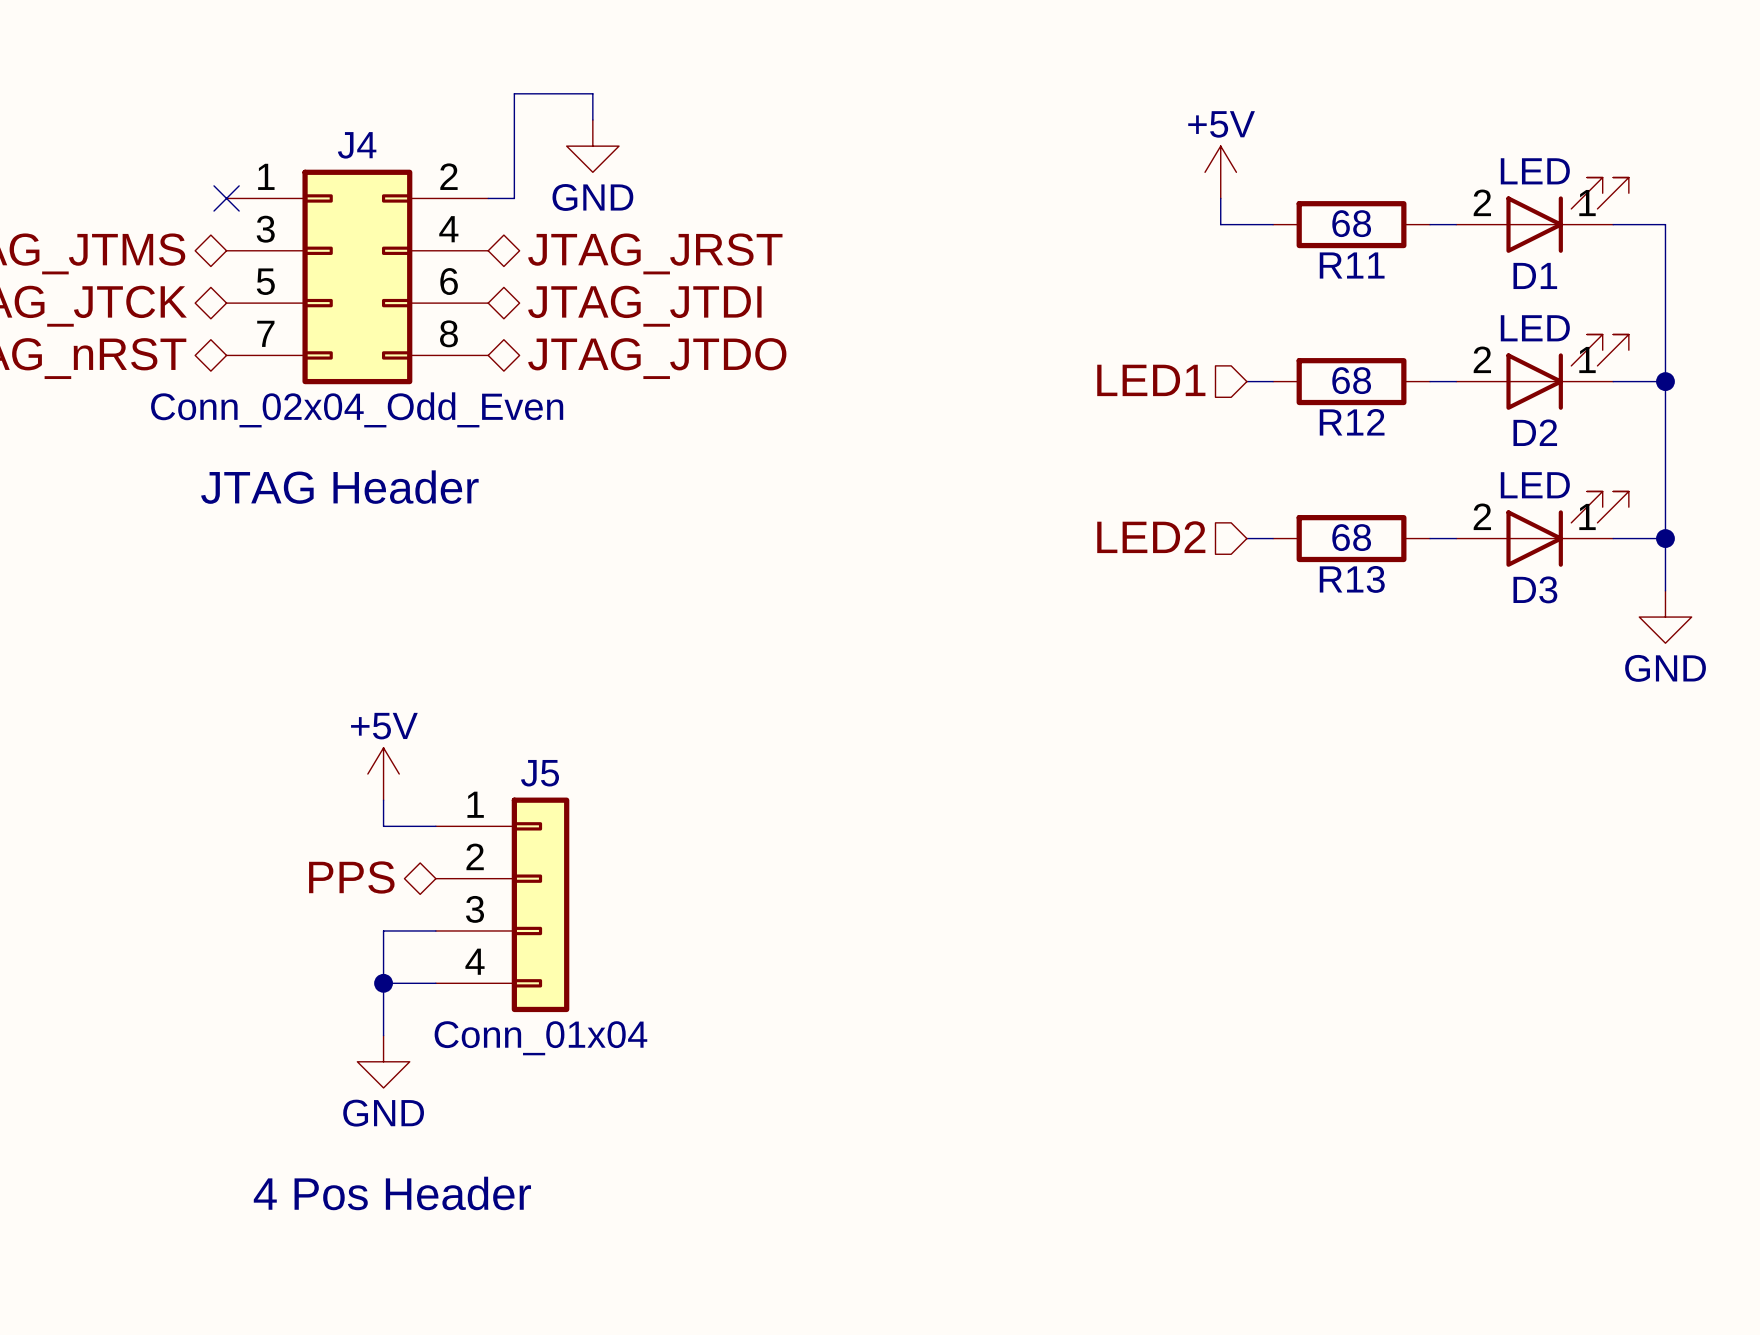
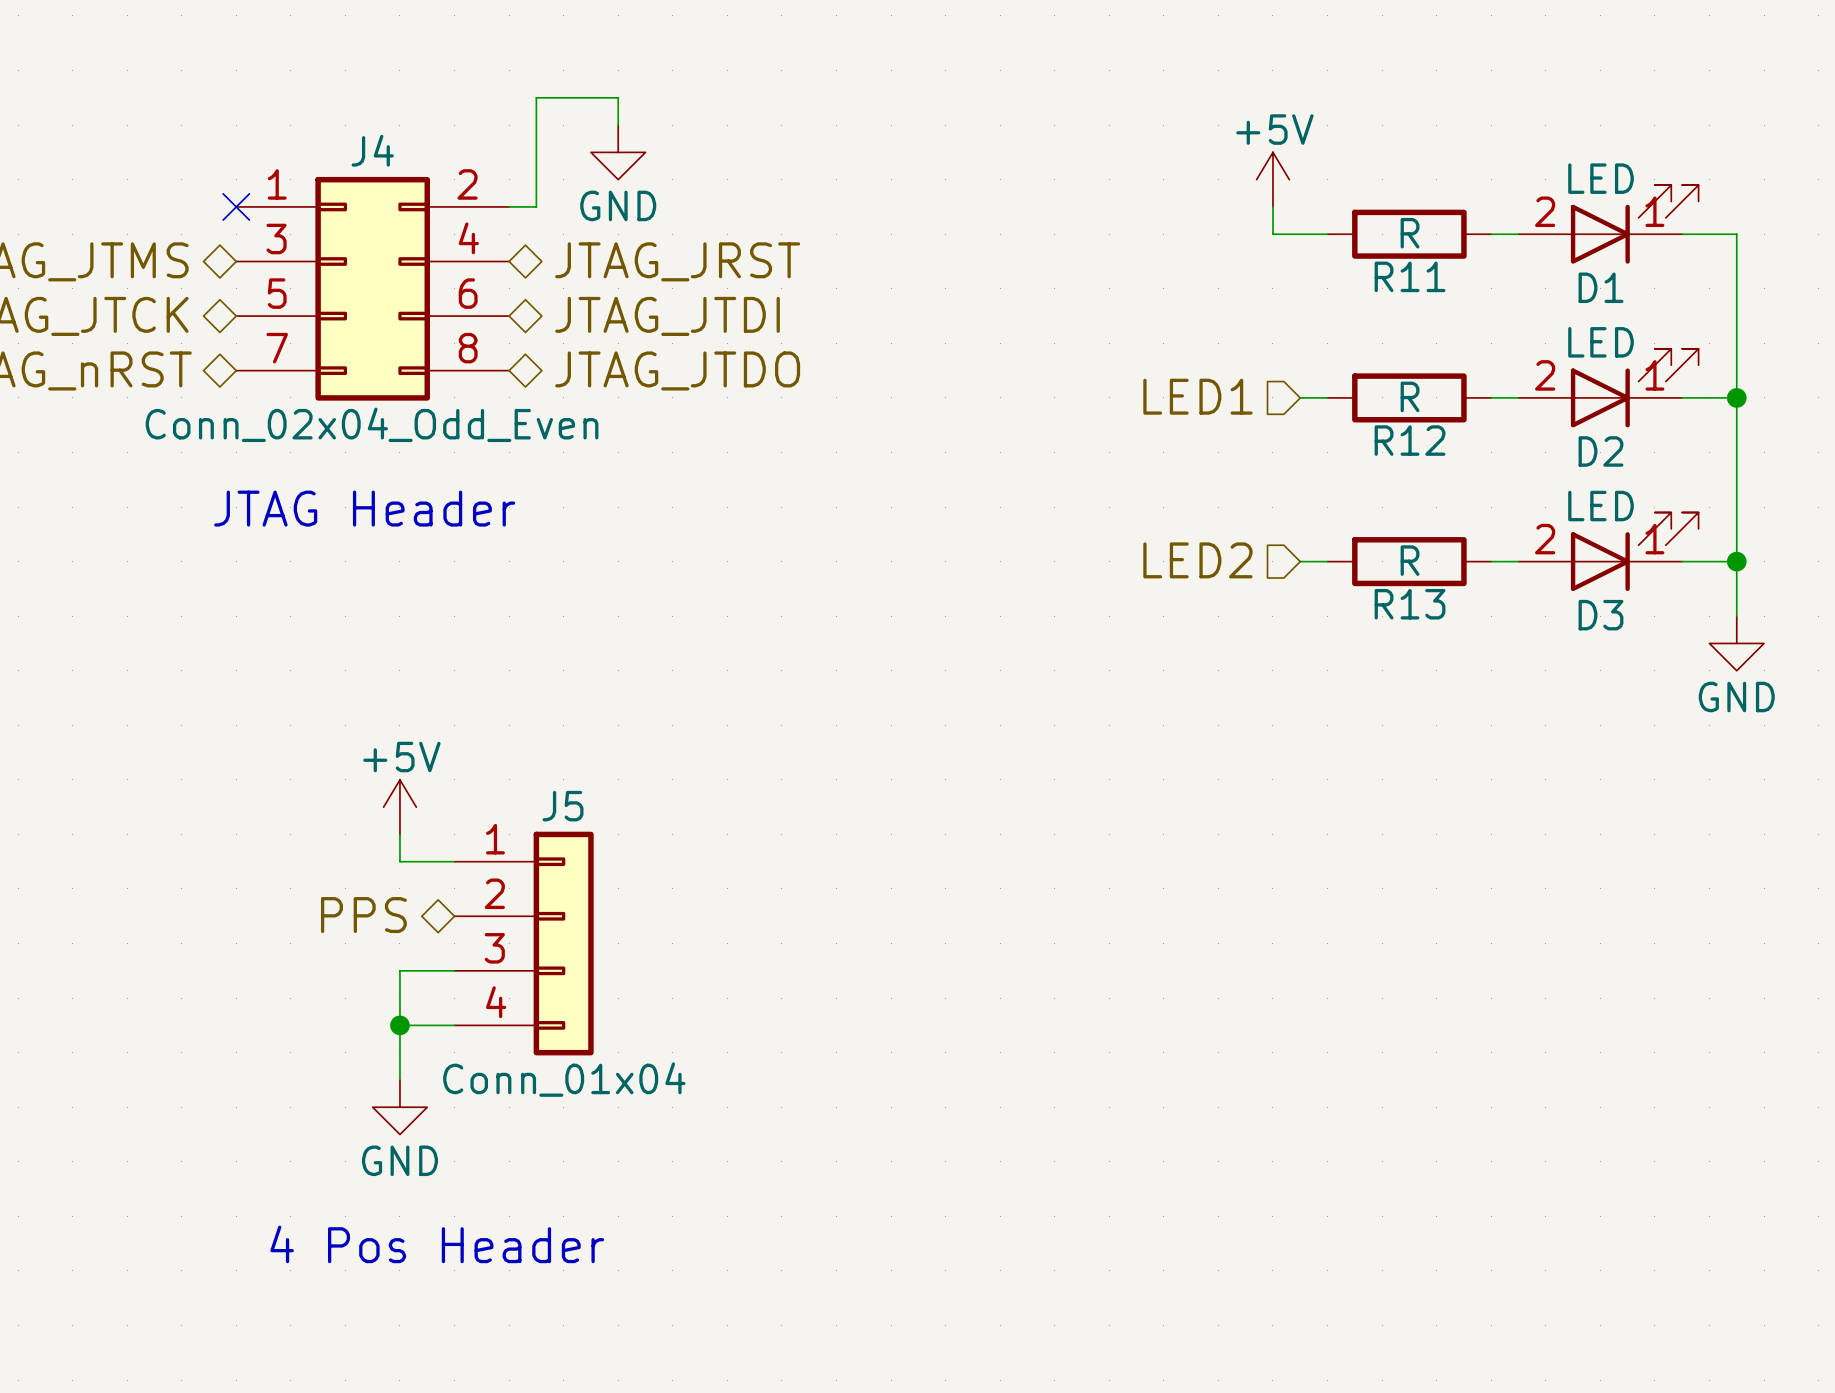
R11 value: 68 (1351, 223) -> R (1410, 233)
R12 value: 68 (1351, 380) -> R (1410, 396)
R13 value: 68 (1351, 537) -> R (1410, 560)

